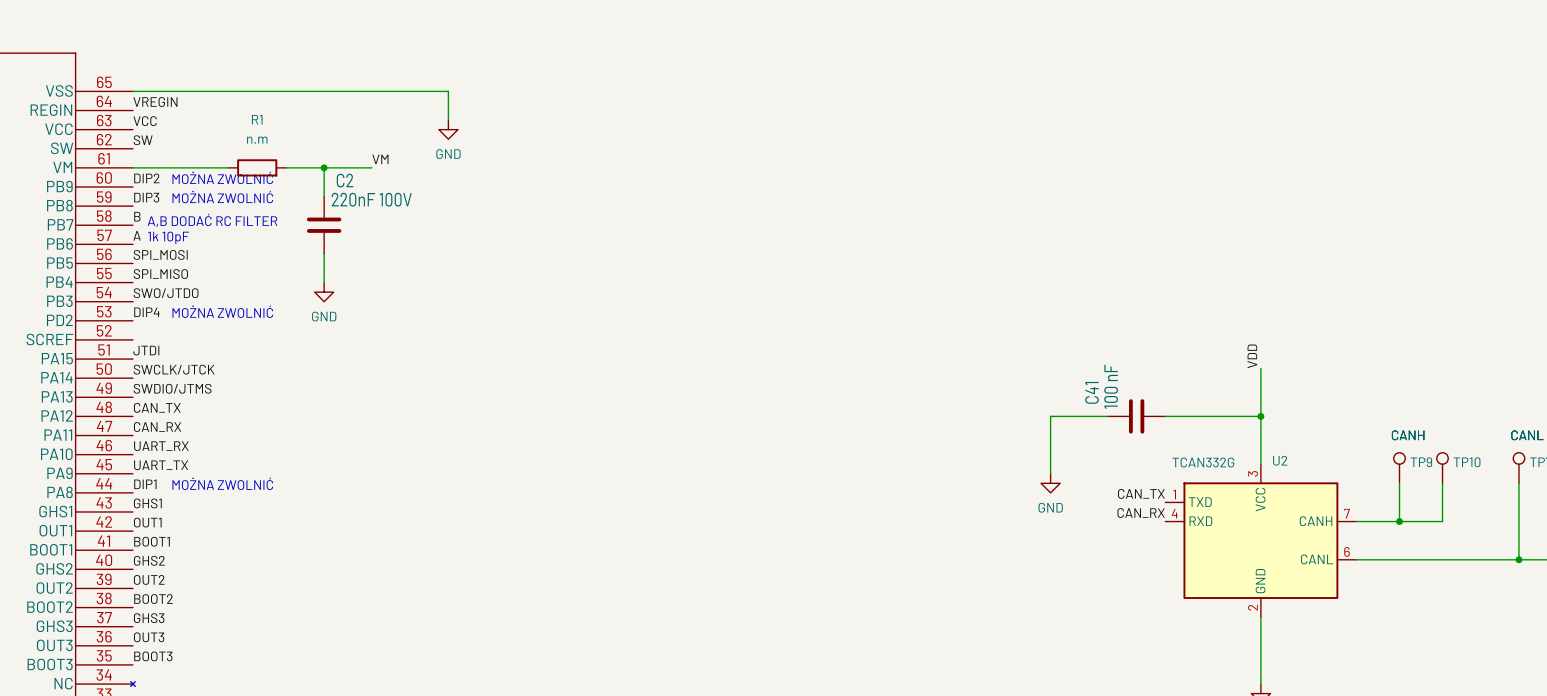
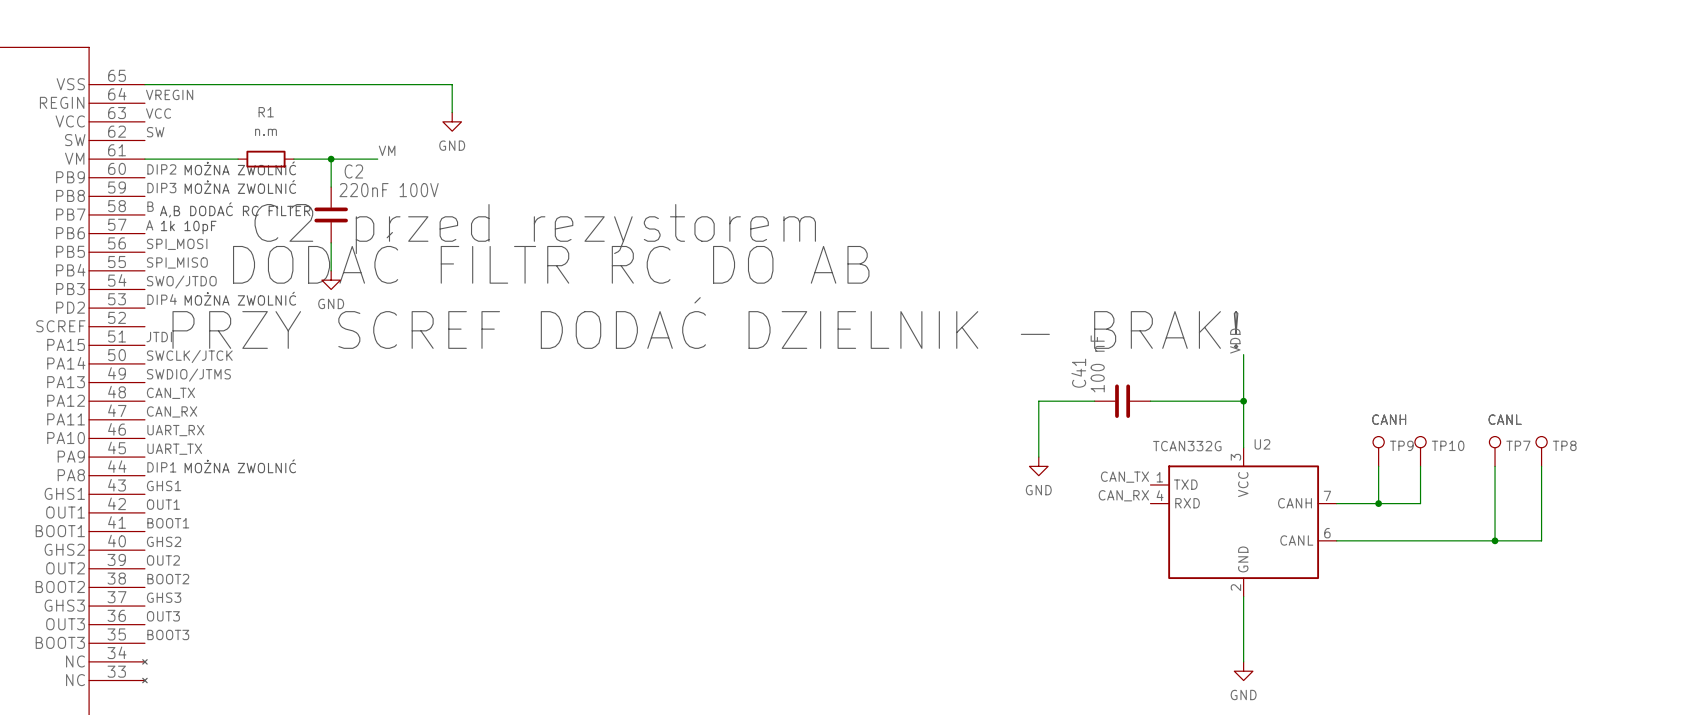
text: none -> C2 przed rezystorem (535, 229)
text: none -> DODAĆ FILTR RC DO AB (551, 257)
text: none -> PRZY SCREF DODAĆ DZIELNIK - BRAK! (705, 323)

